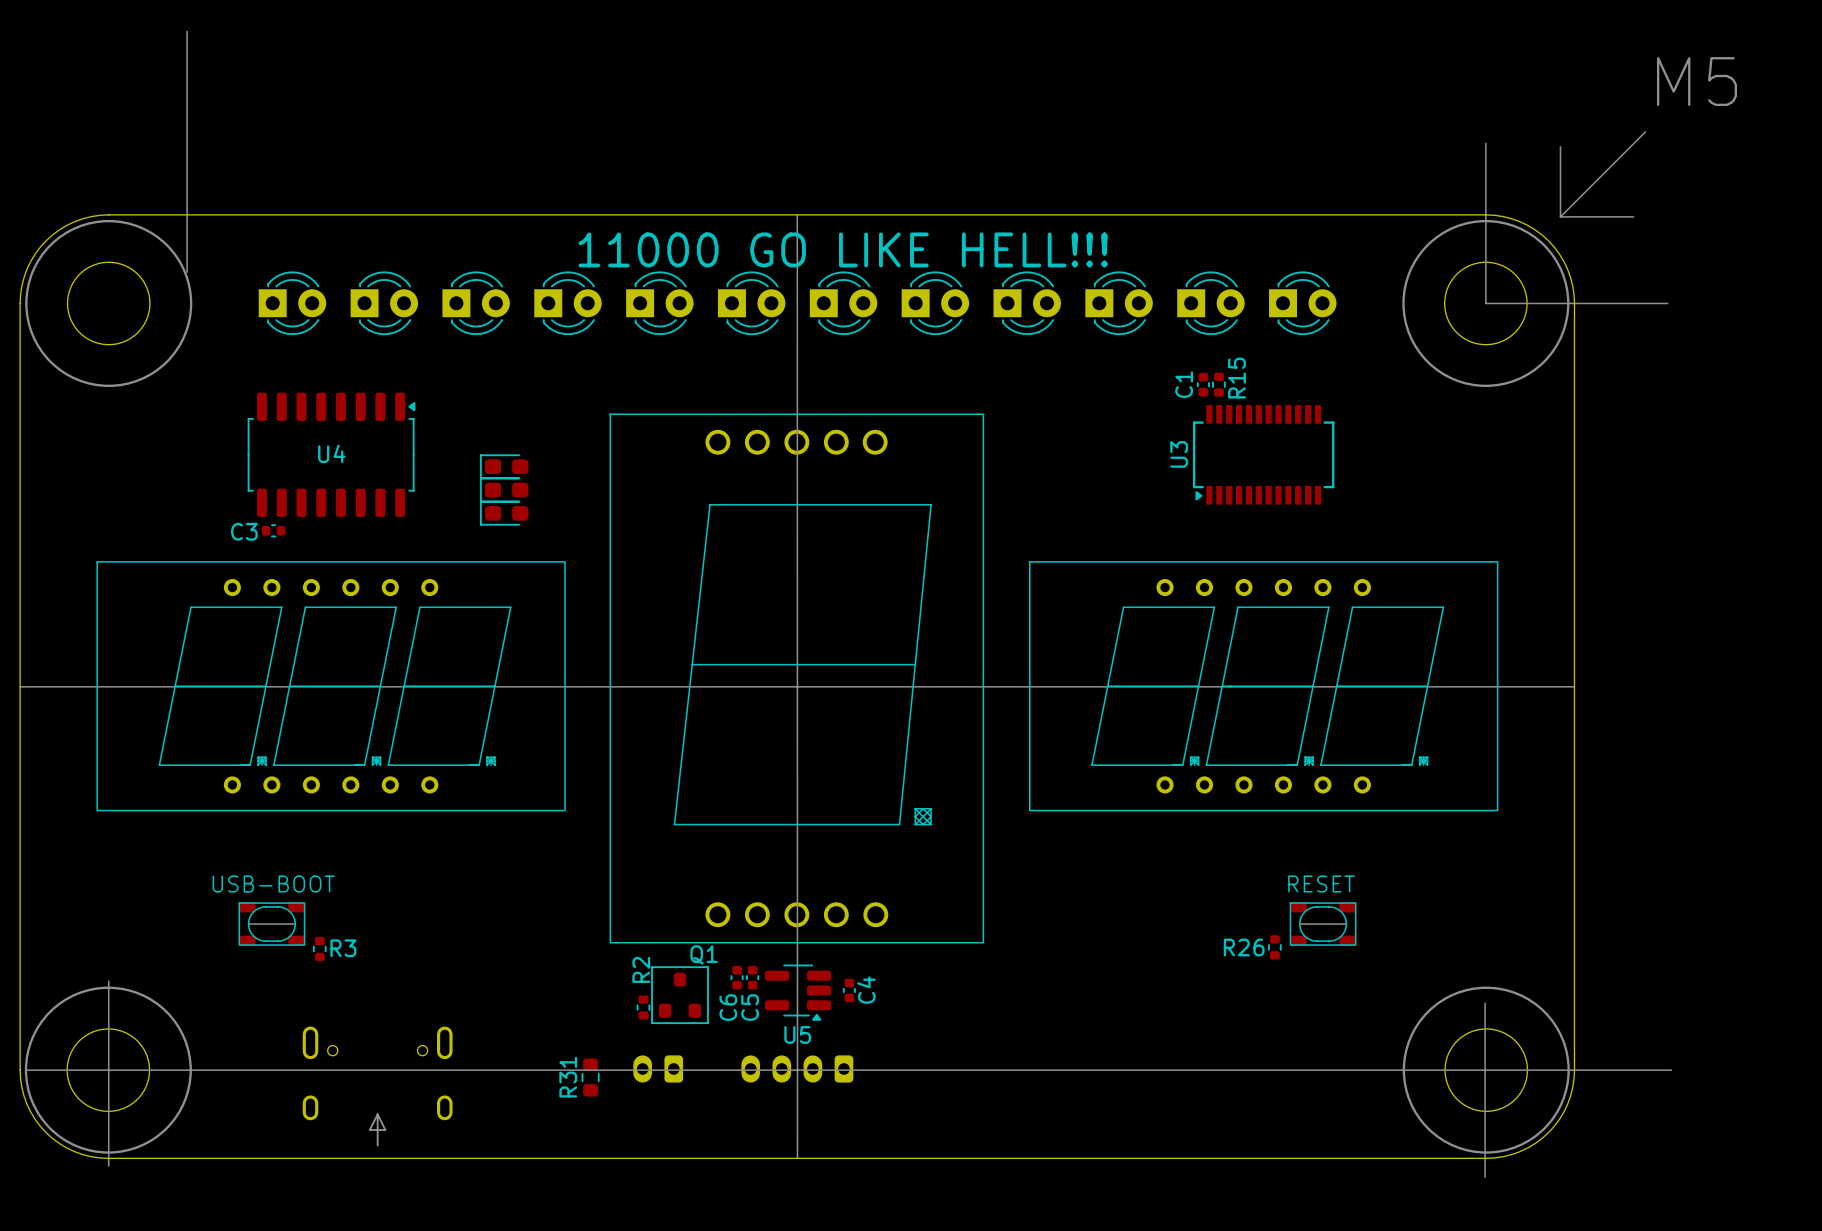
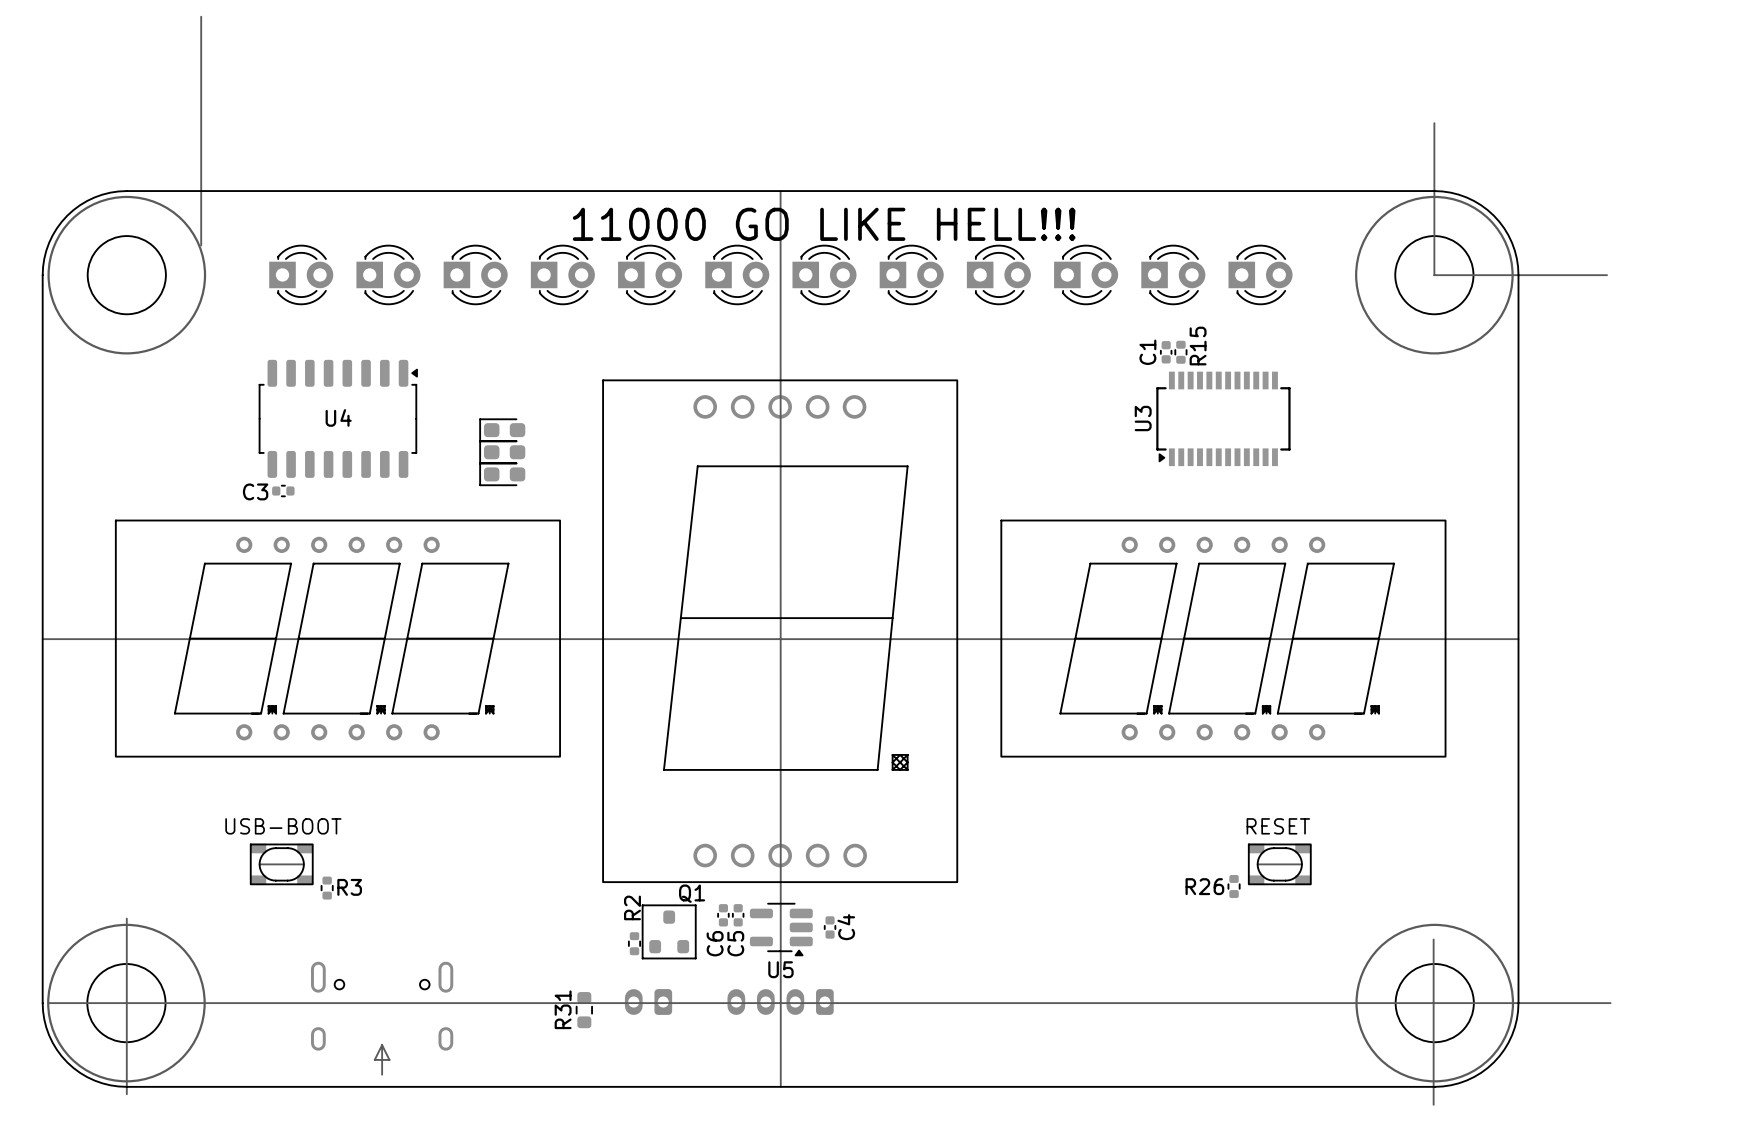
text: M5 (1697, 81) -> none
line: (1645, 131) (1560, 216) -> none
line: (1560, 146) (1560, 216) -> none
line: (1560, 216) (1633, 216) -> none

